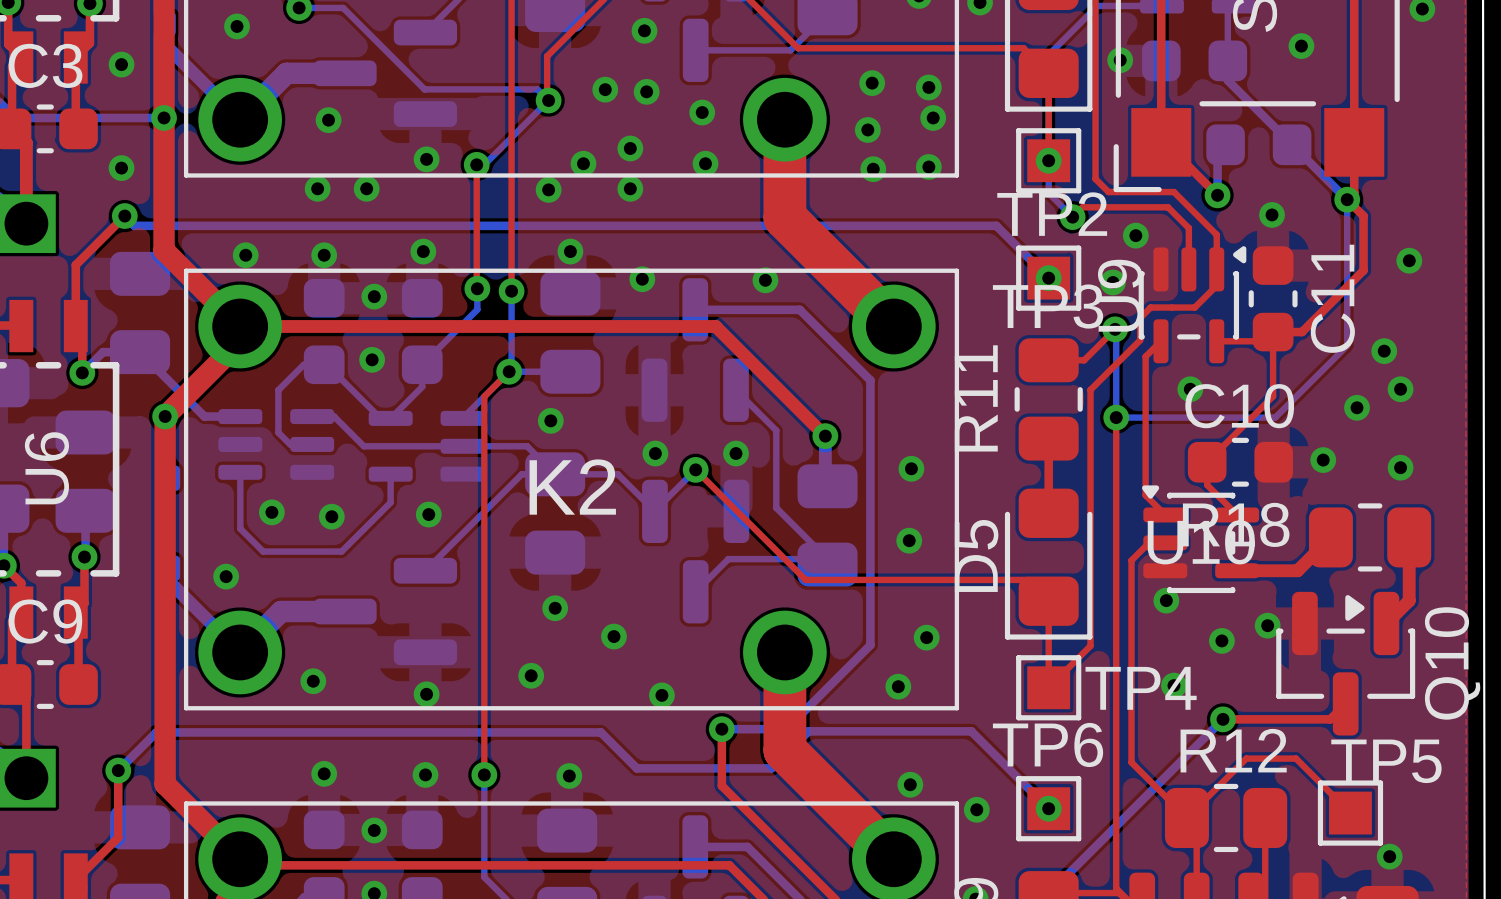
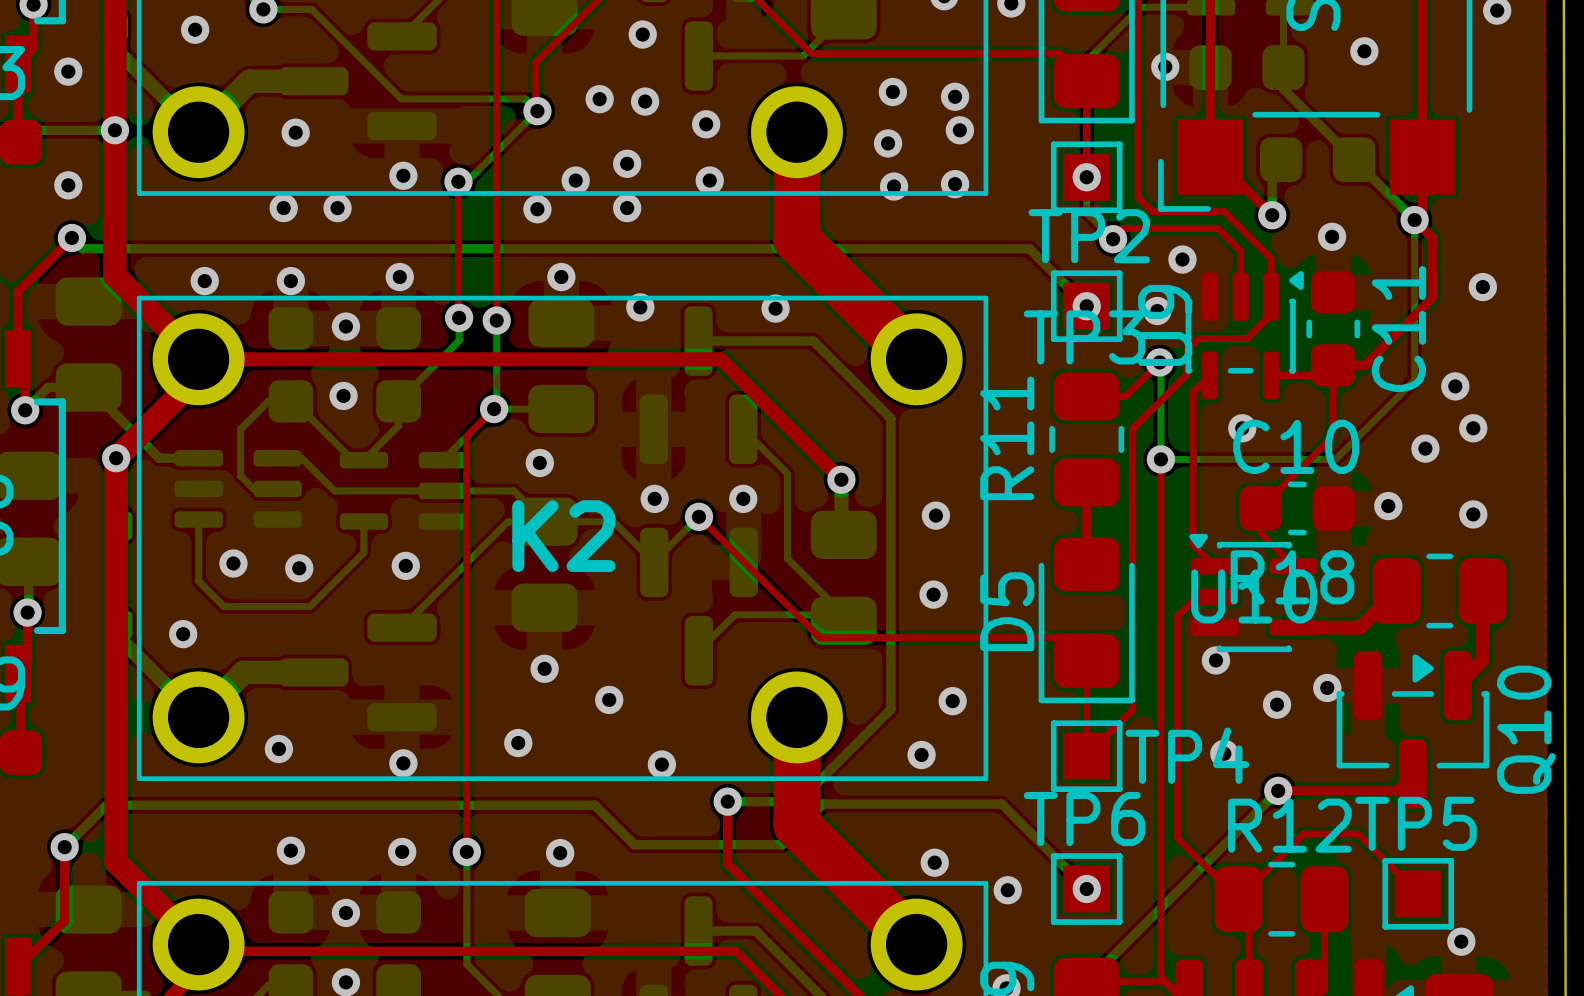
TP5 name position: TP5 (1386, 761) -> TP5 (1415, 823)

